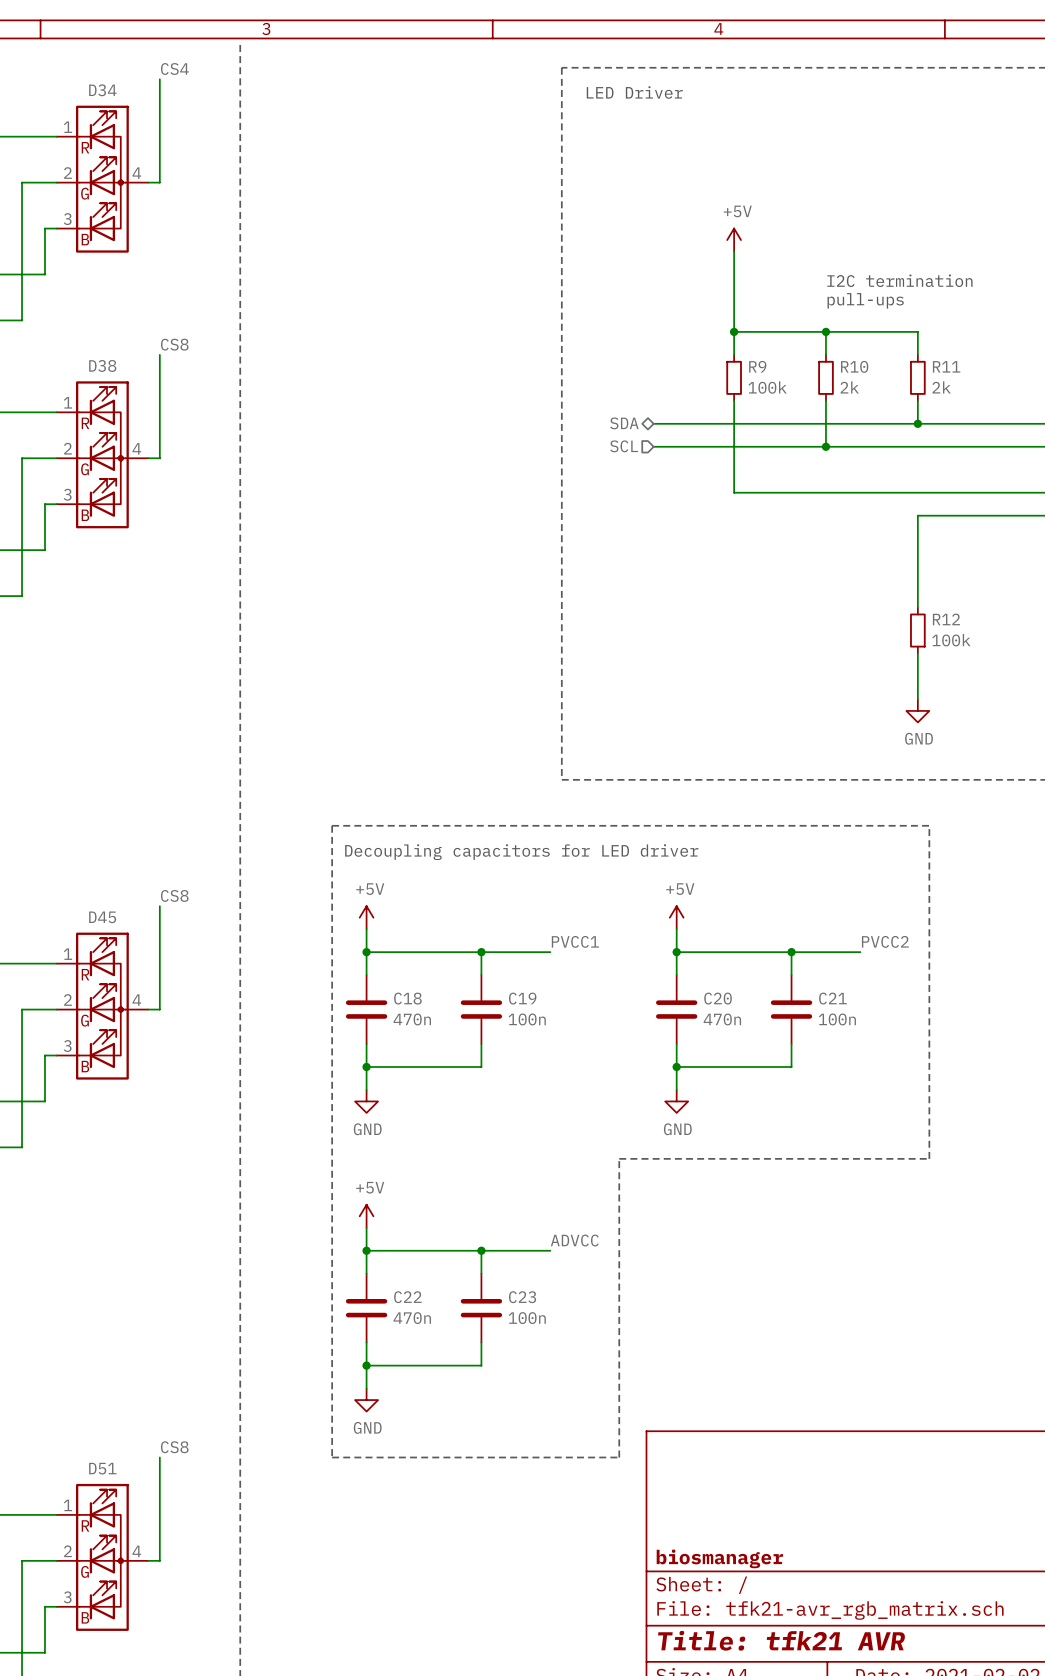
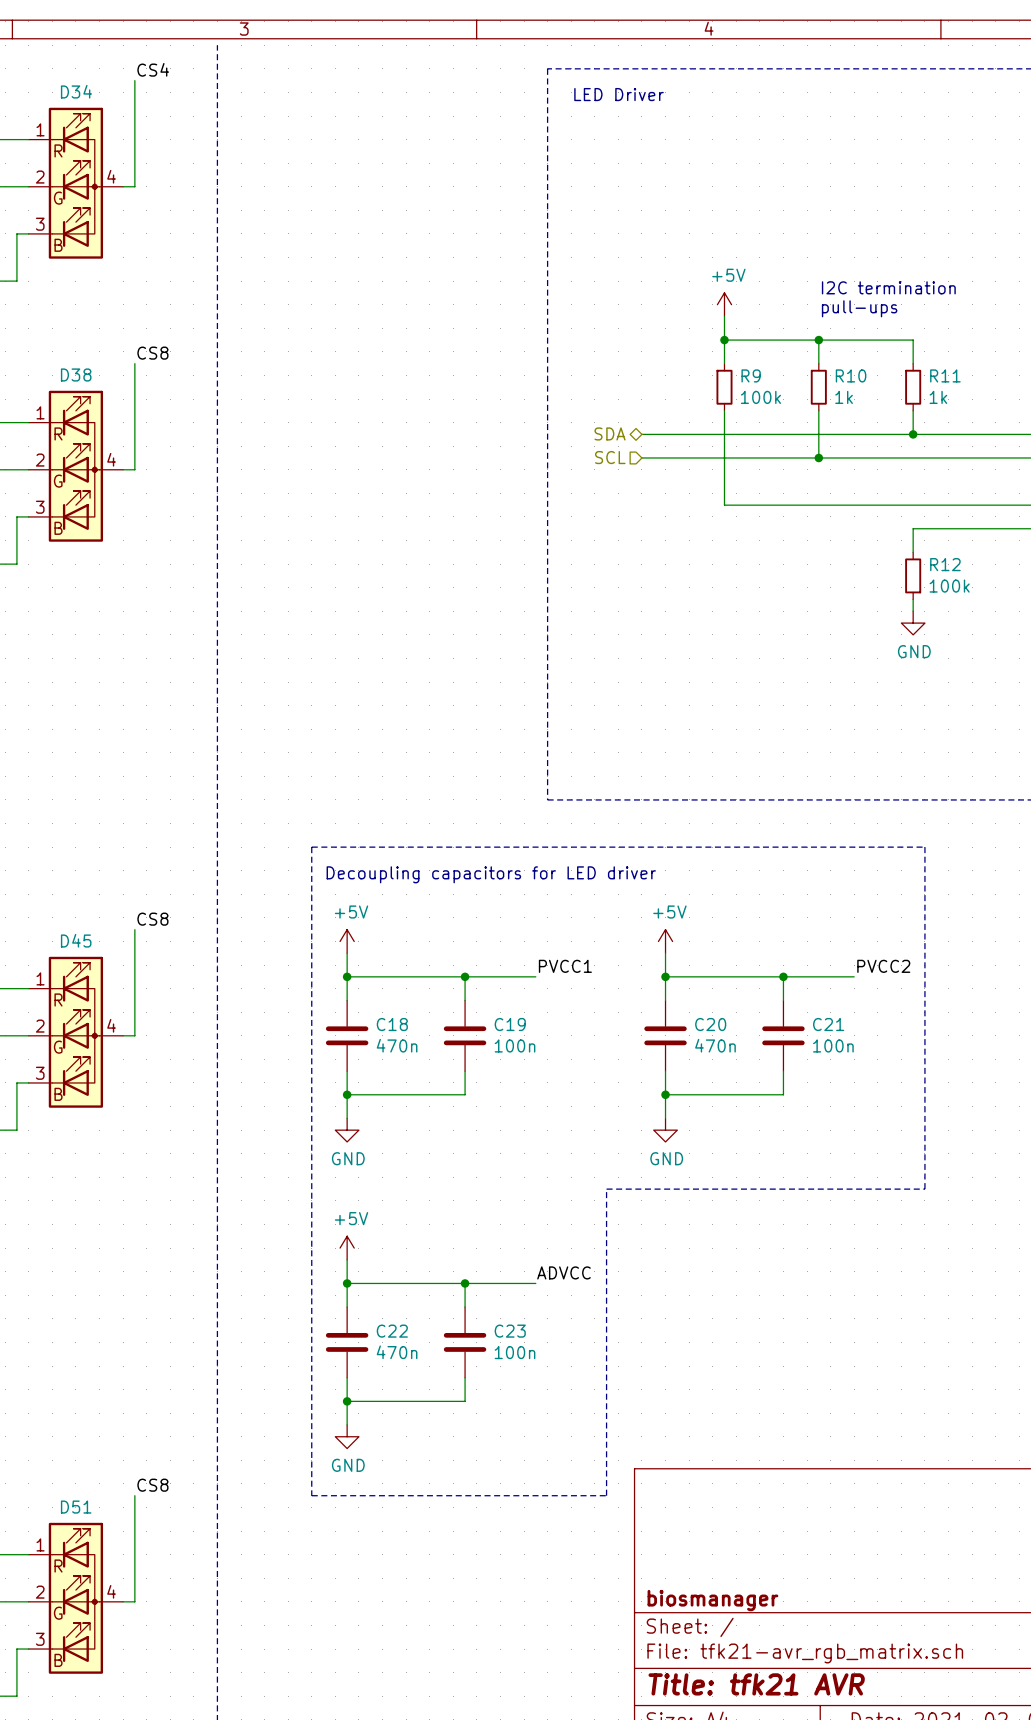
power symbol position: +5V (734, 240) -> +5V (724, 304)
wire: (734, 251) (734, 308) -> none
R10 value: 2k (849, 387) -> 1k (844, 397)
R11 value: 2k (941, 387) -> 1k (938, 397)
wire: (917, 538) (917, 584) -> none
power symbol: none -> GND (913, 623)
R12 position: (917, 630) -> (913, 575)
wire: (917, 653) (917, 699) -> none
power symbol: GND (917, 710) -> none

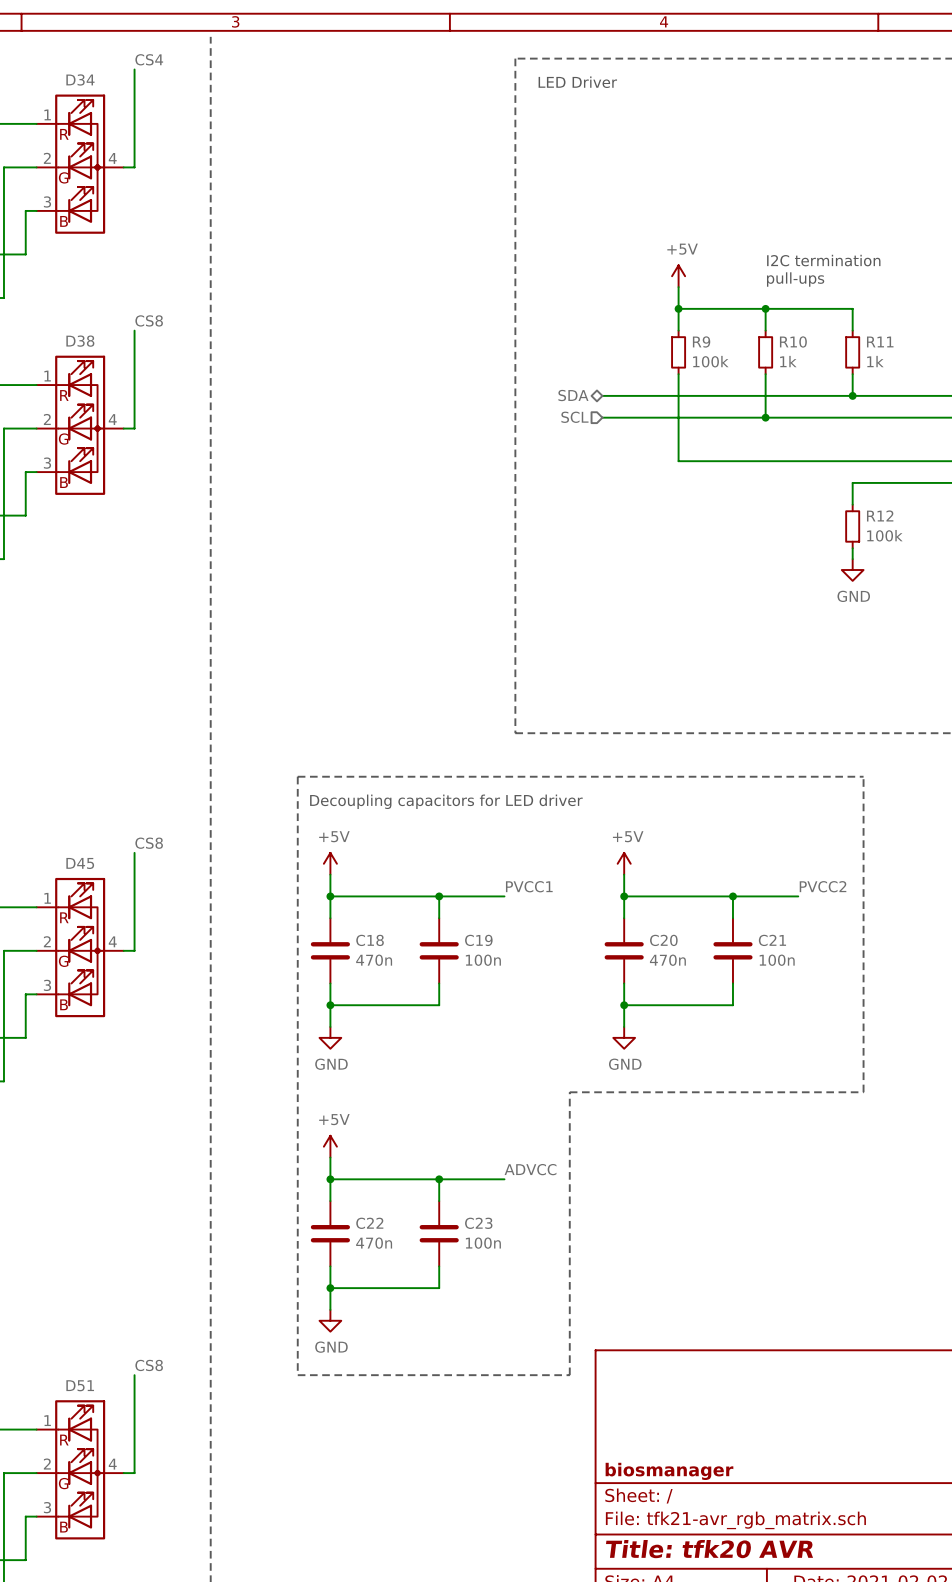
title block: Title: tfk21 AVR (756, 1684) -> Title: tfk20 AVR (709, 1549)

